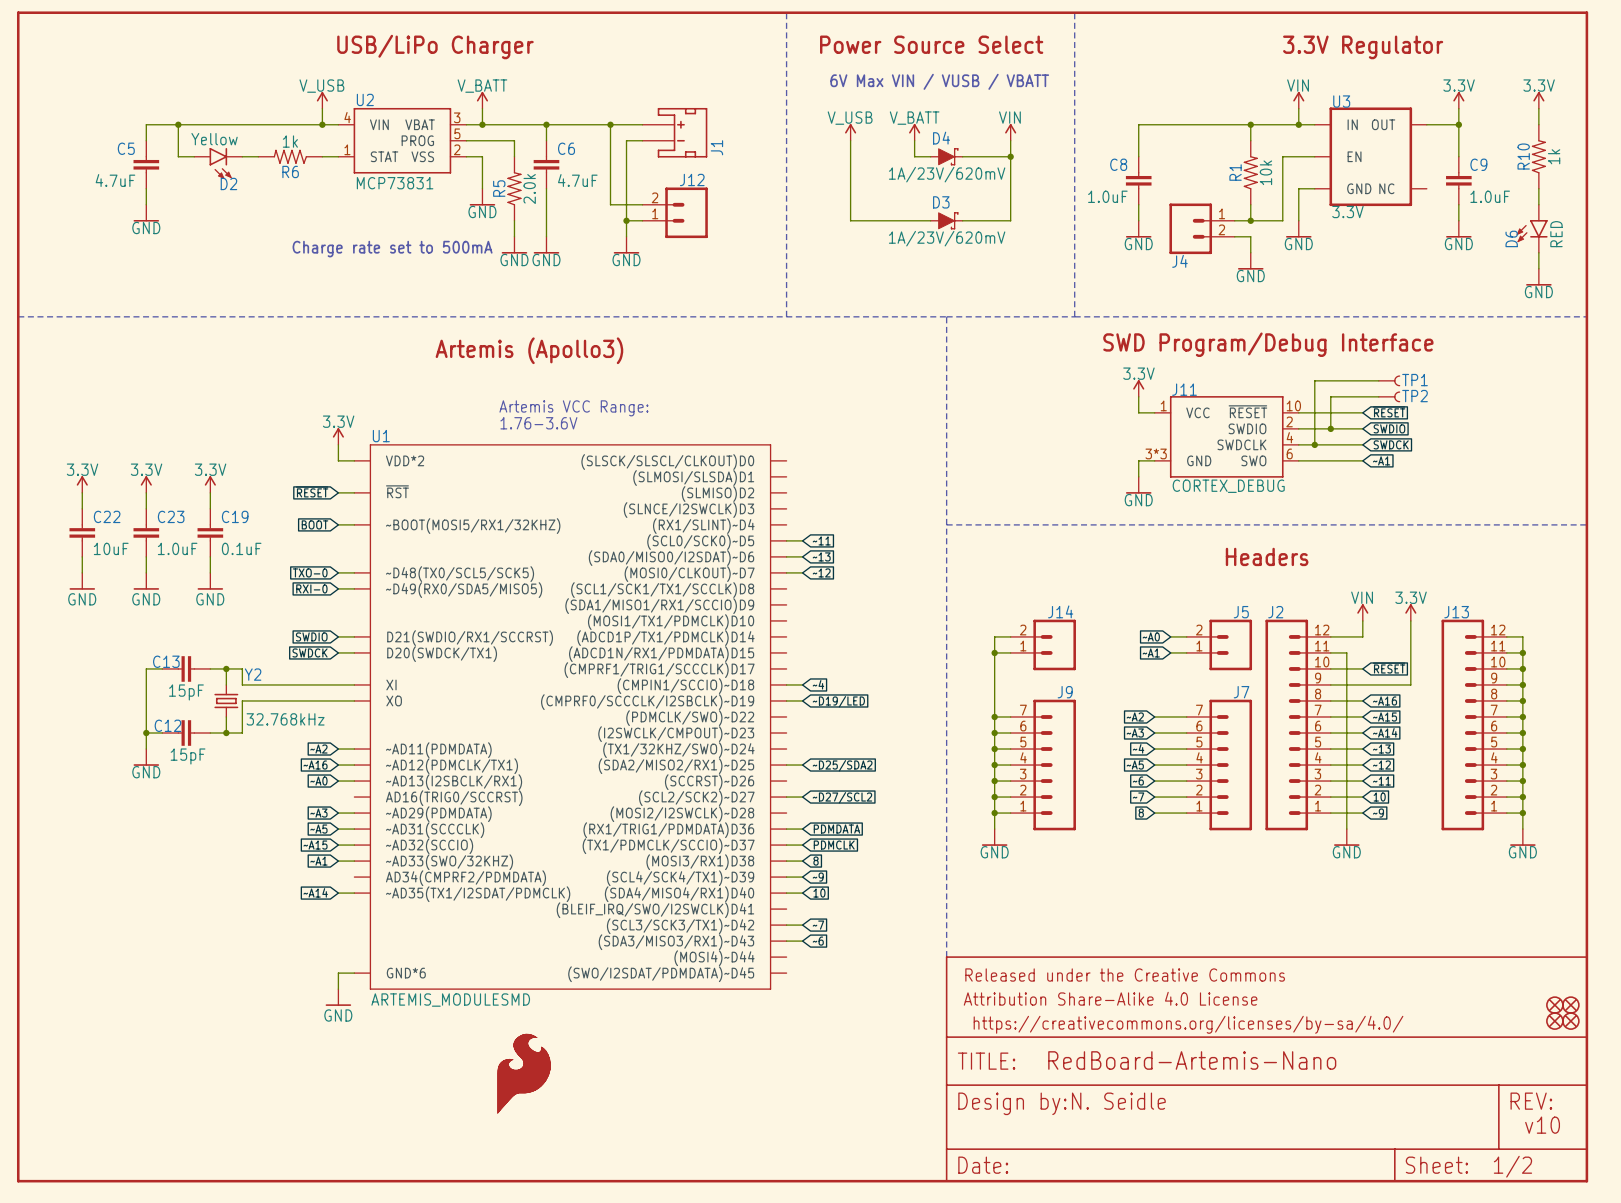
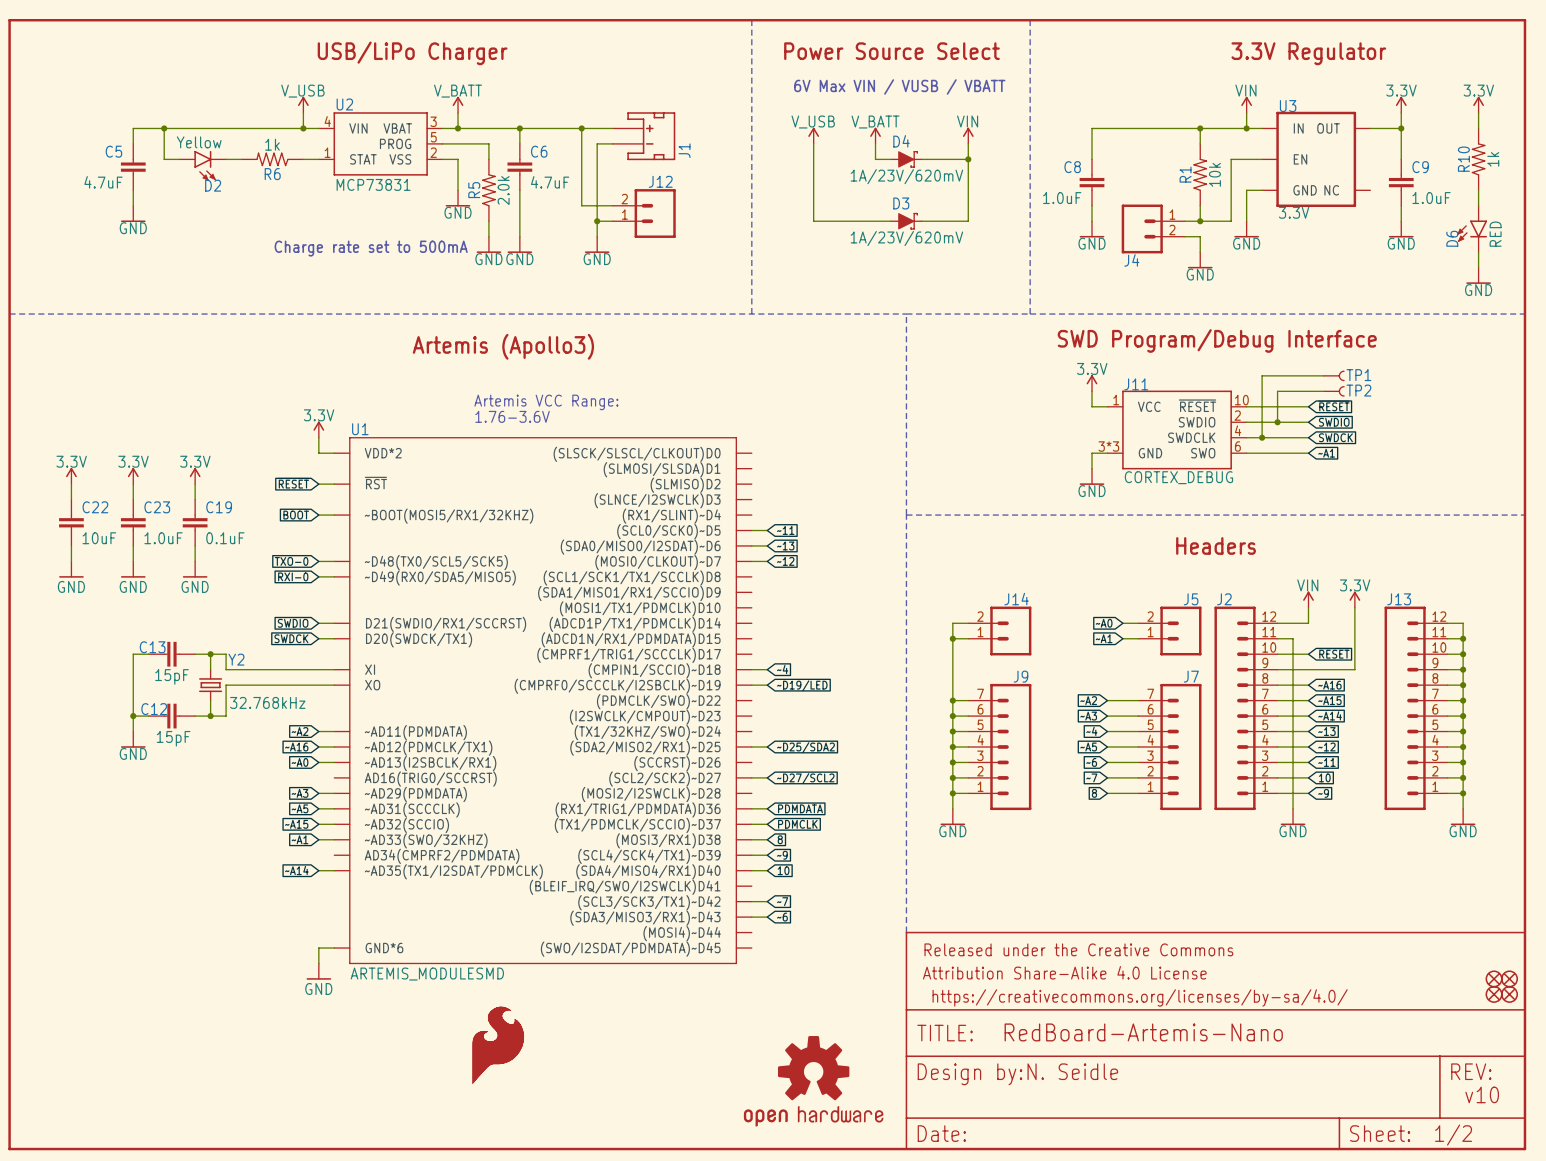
part: none -> (813, 1081)

